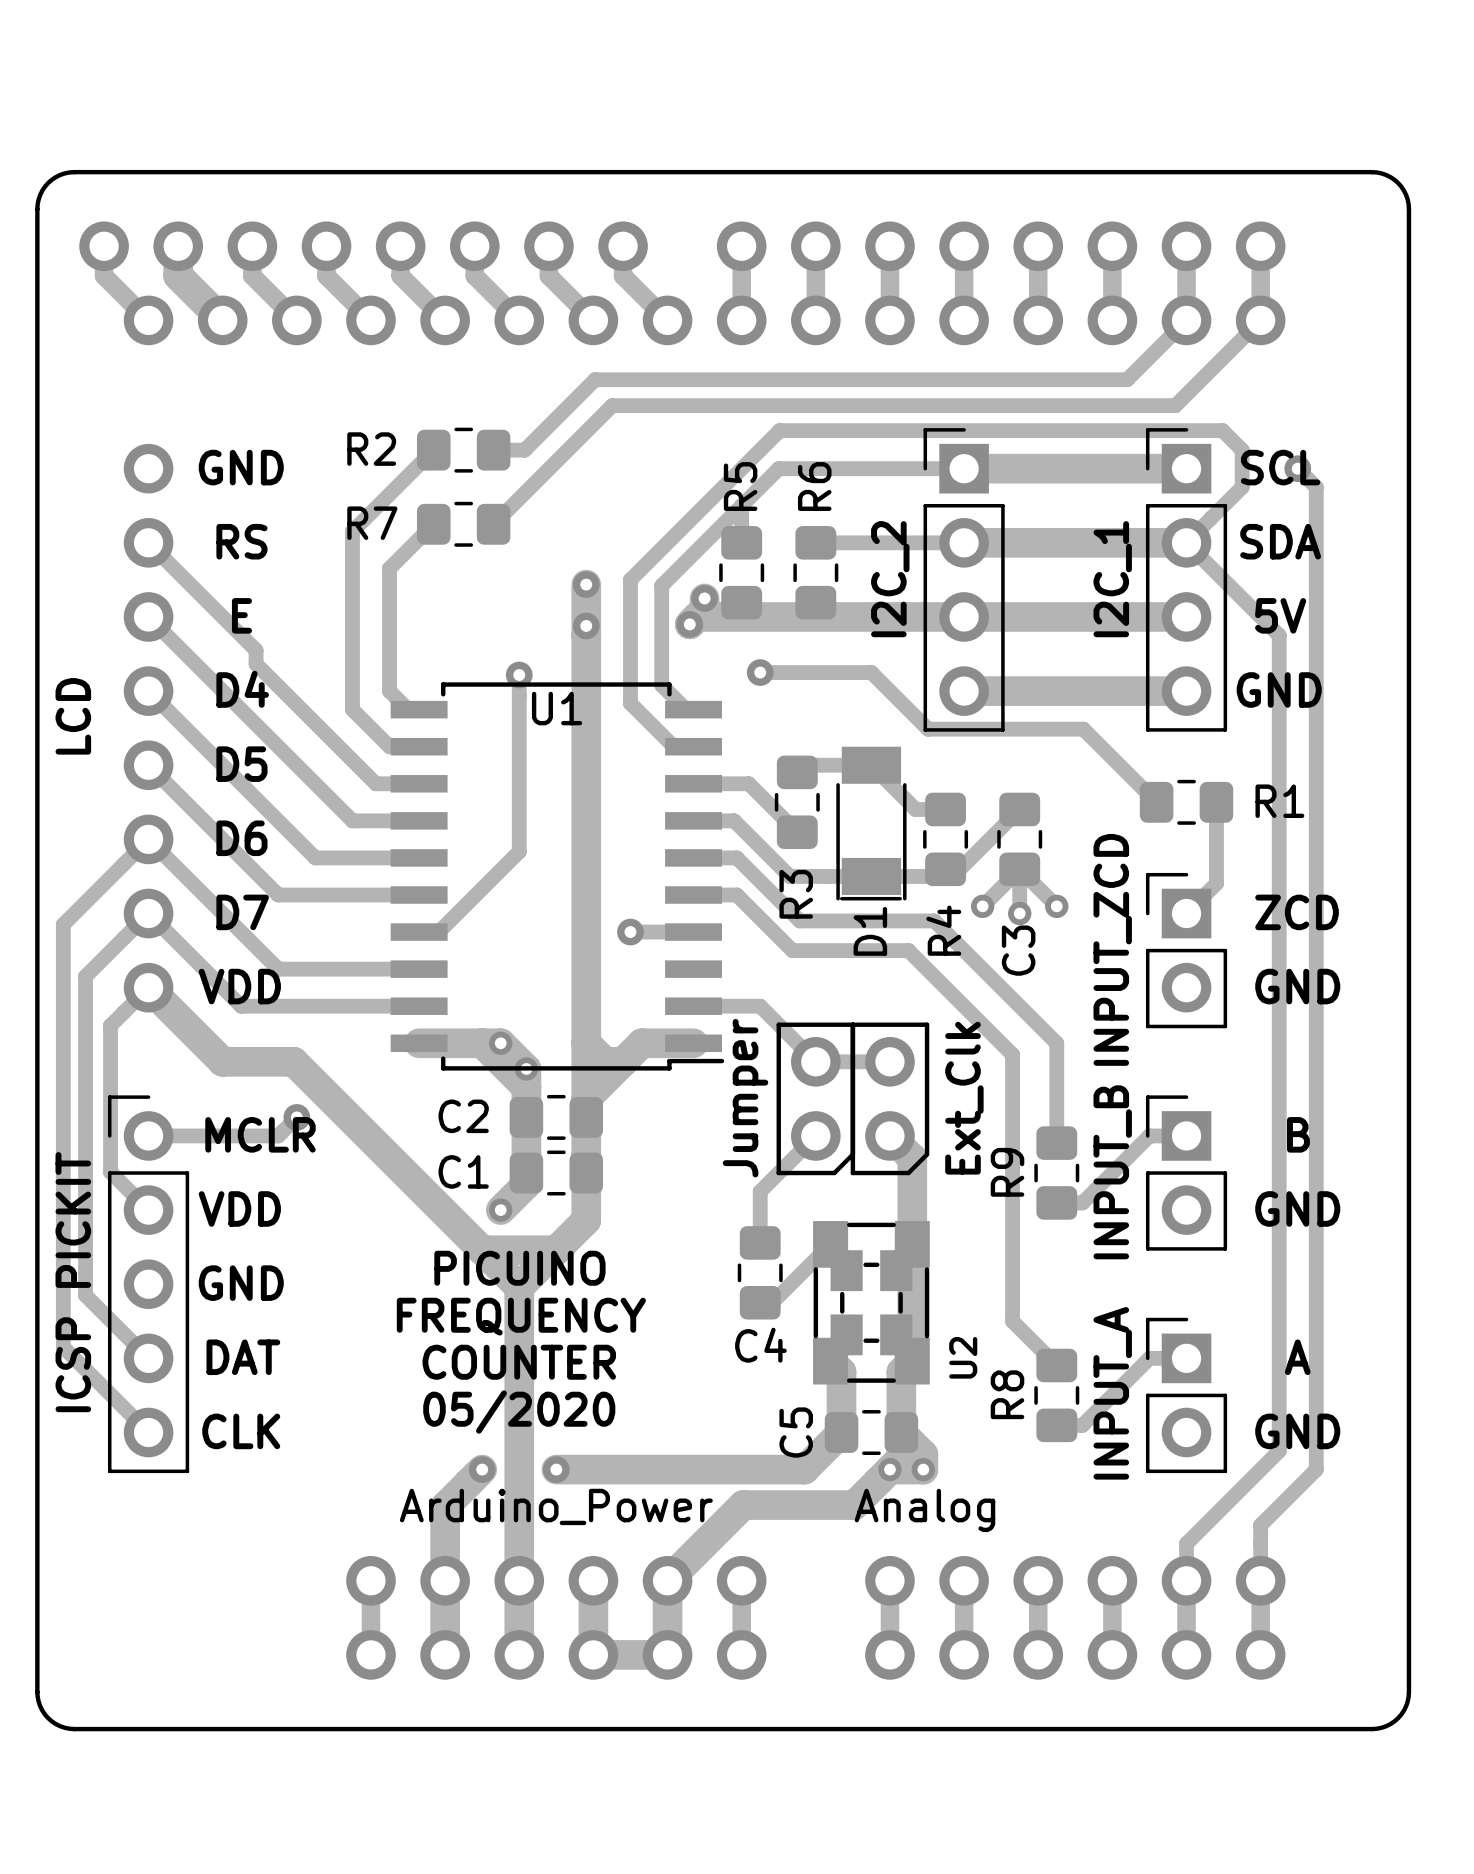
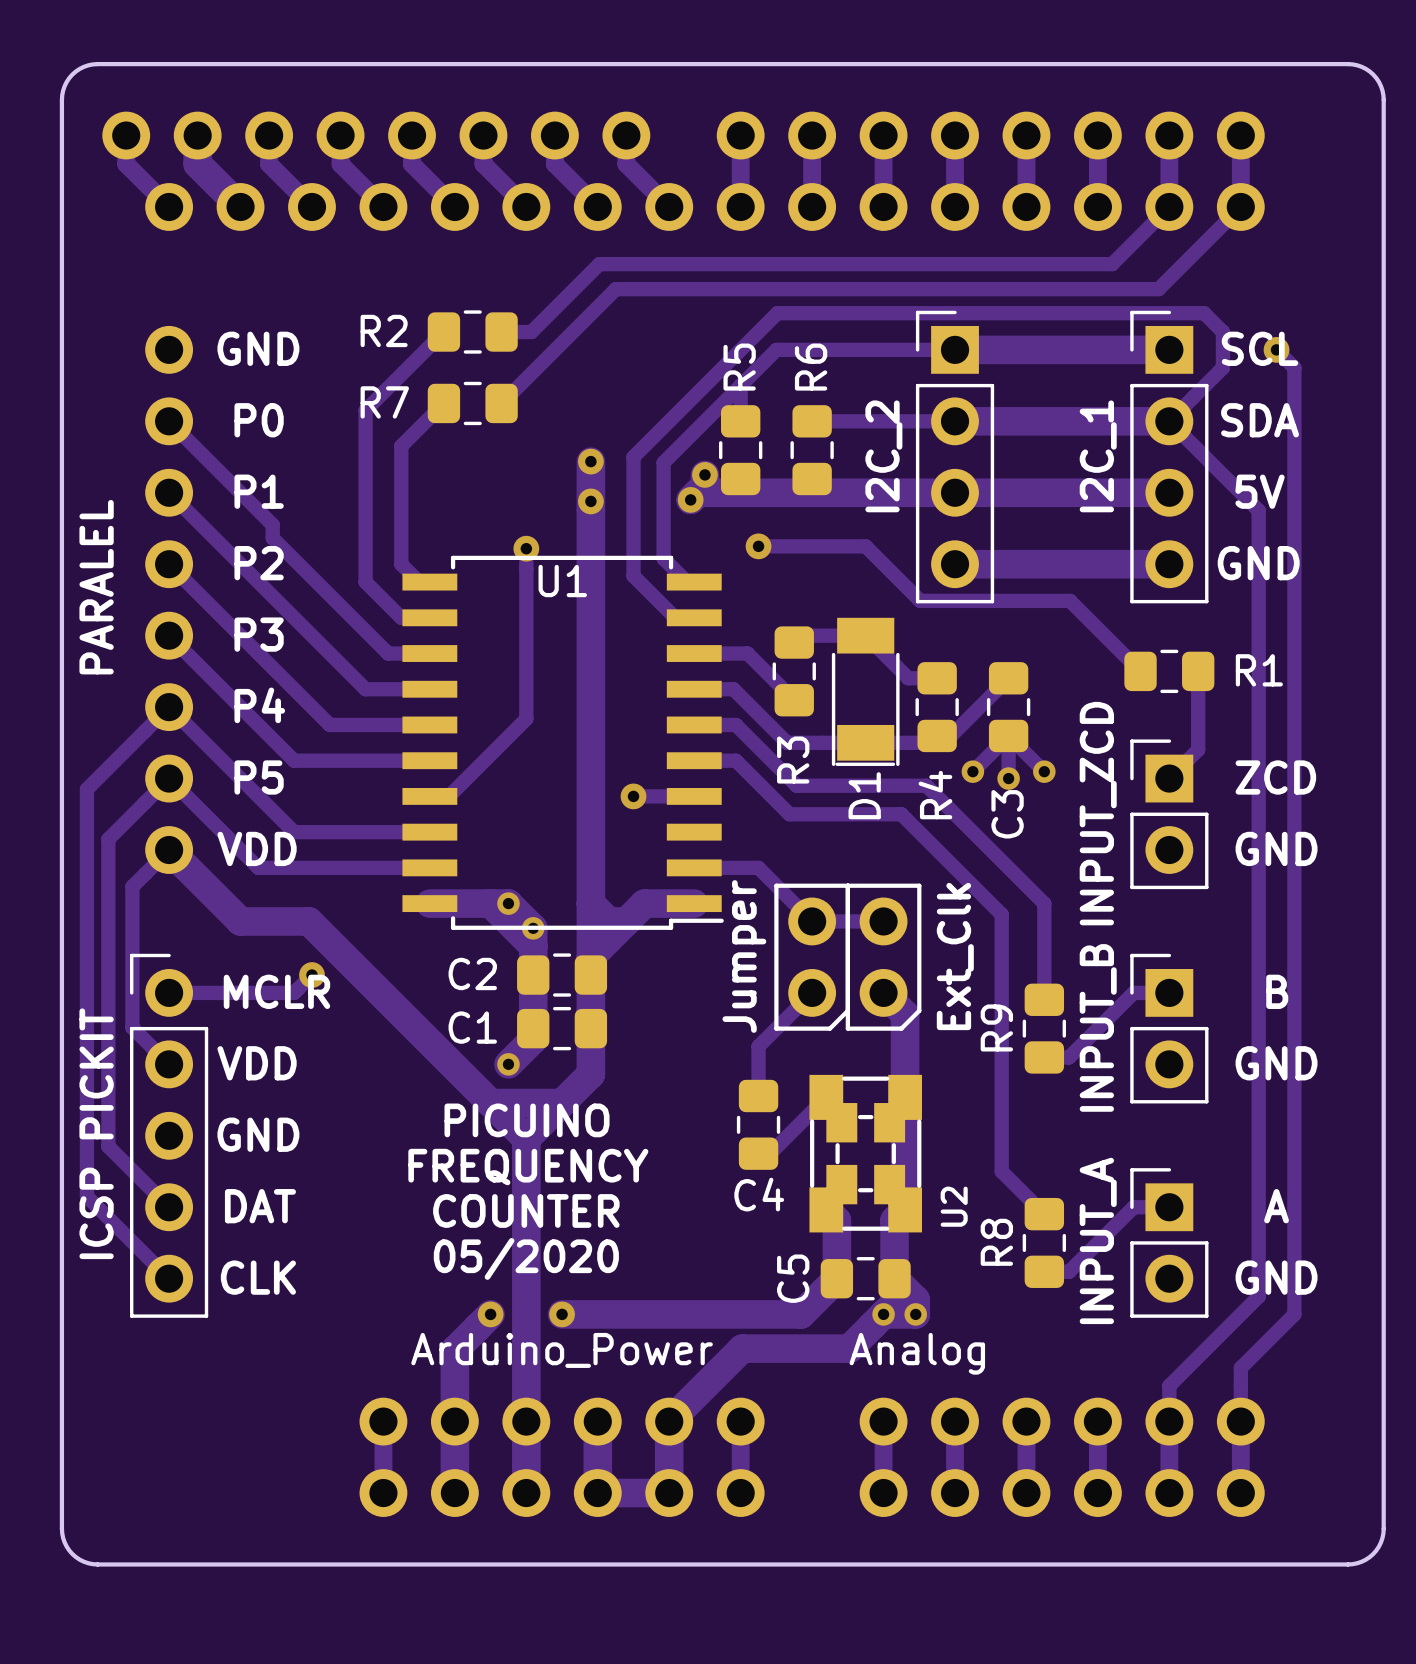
text: RS (241, 541) -> P0 (259, 420)
text: E (241, 615) -> P1 (259, 491)
text: D4 (242, 689) -> P2 (259, 563)
part value: LCD (73, 716) -> PARALEL (96, 587)
text: D5 (241, 764) -> P3 (259, 634)
text: D6 (241, 838) -> P4 (259, 705)
text: D7 (242, 912) -> P5 (259, 777)

